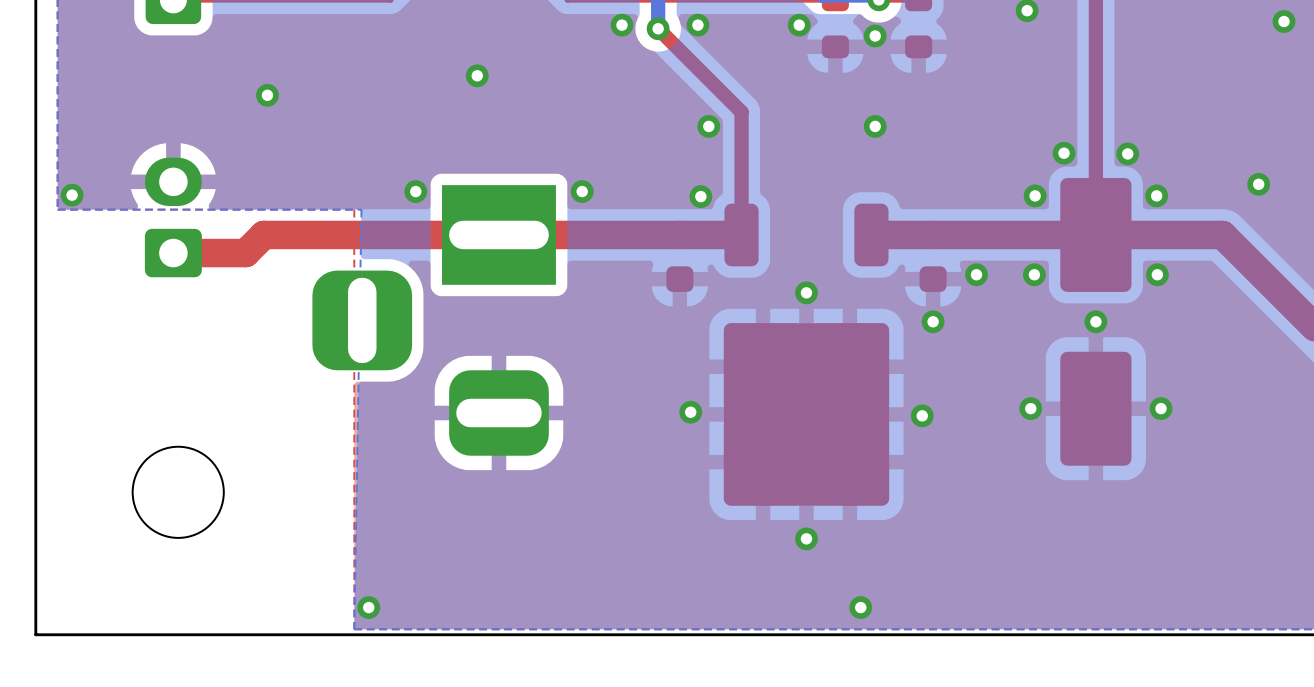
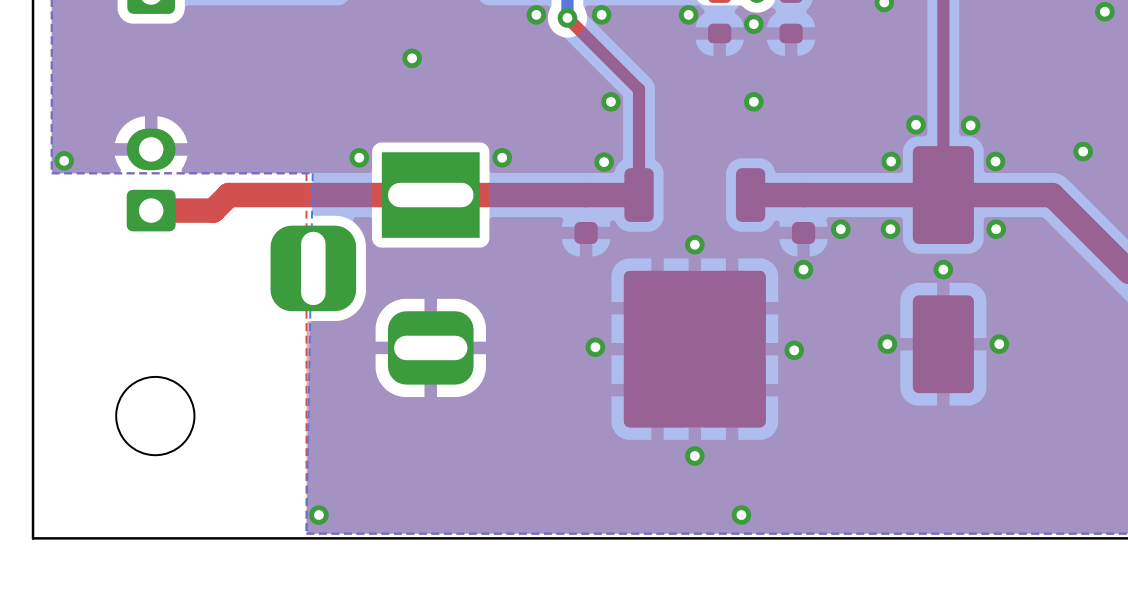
via: (267, 95) -> none

